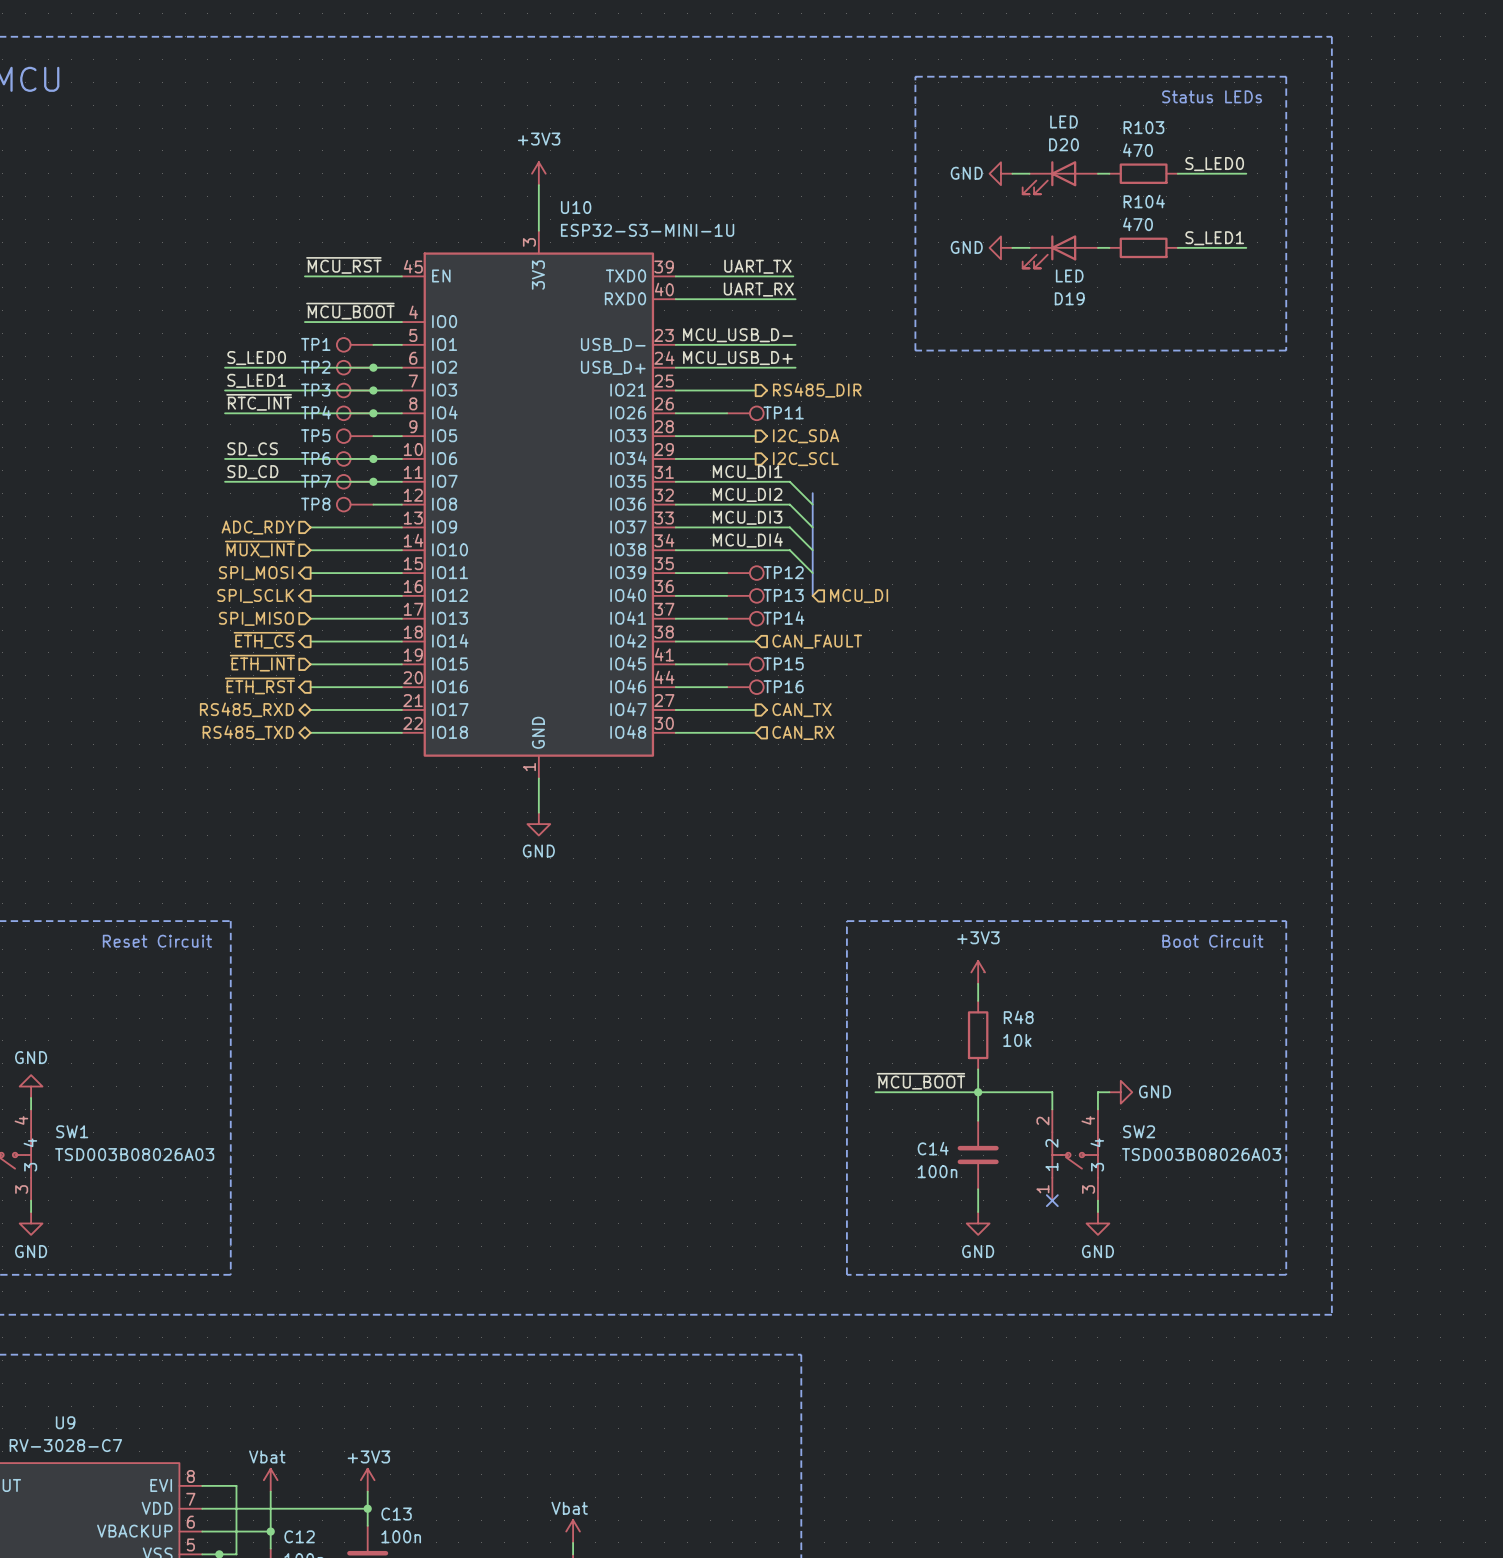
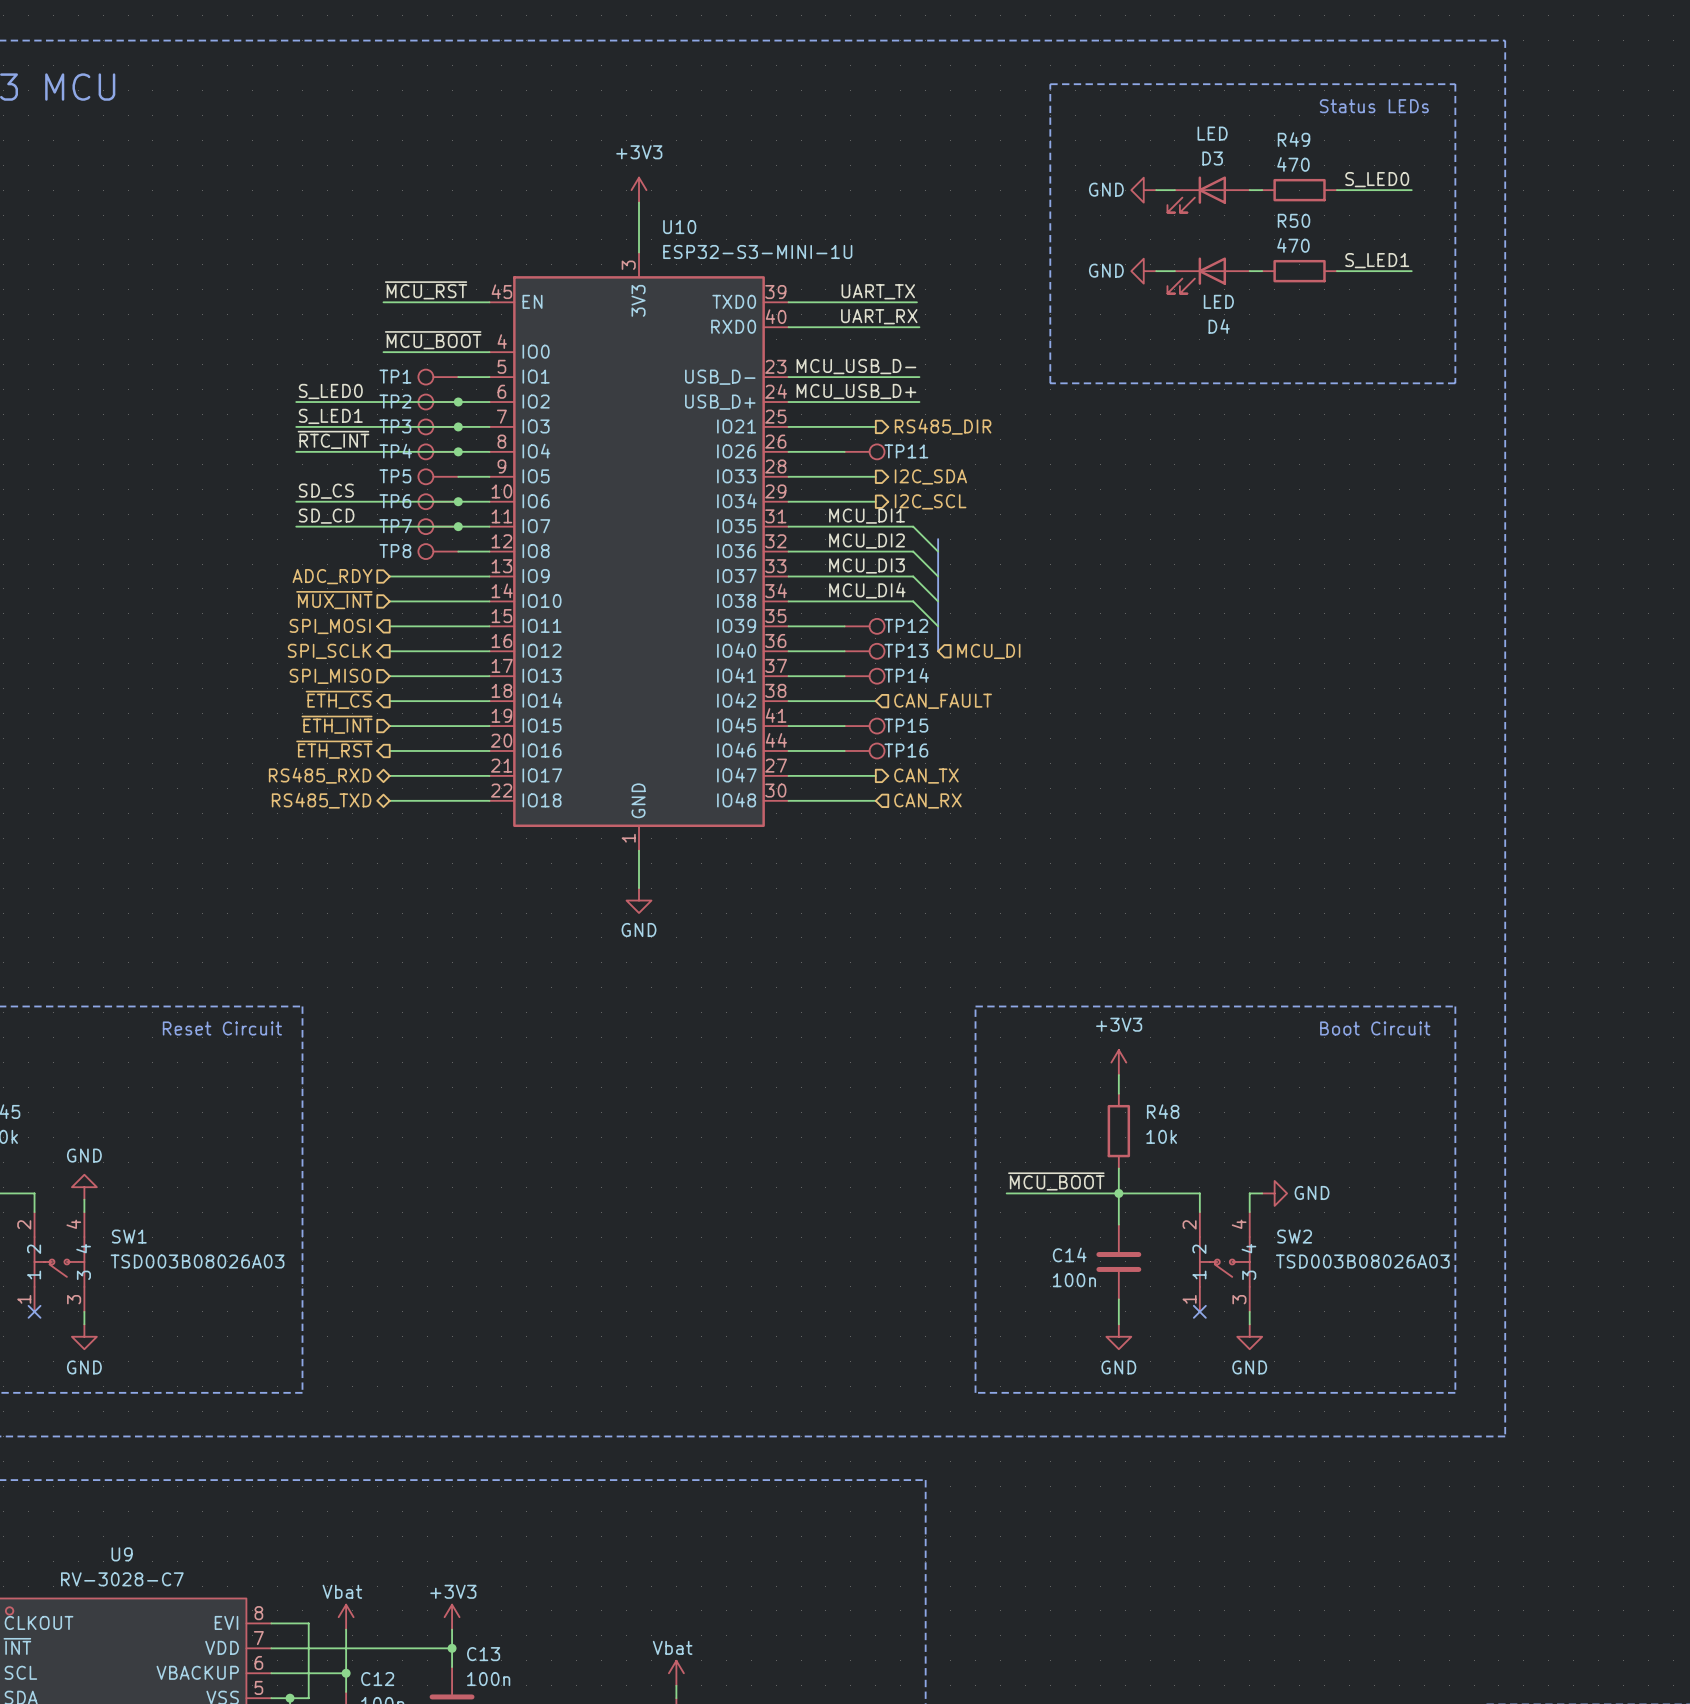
R103 name: R103 (1143, 127) -> R49 (1294, 139)
D20 name: D20 (1064, 144) -> D3 (1212, 158)
R104 name: R104 (1144, 201) -> R50 (1294, 220)
D19 name: D19 (1069, 298) -> D4 (1219, 326)

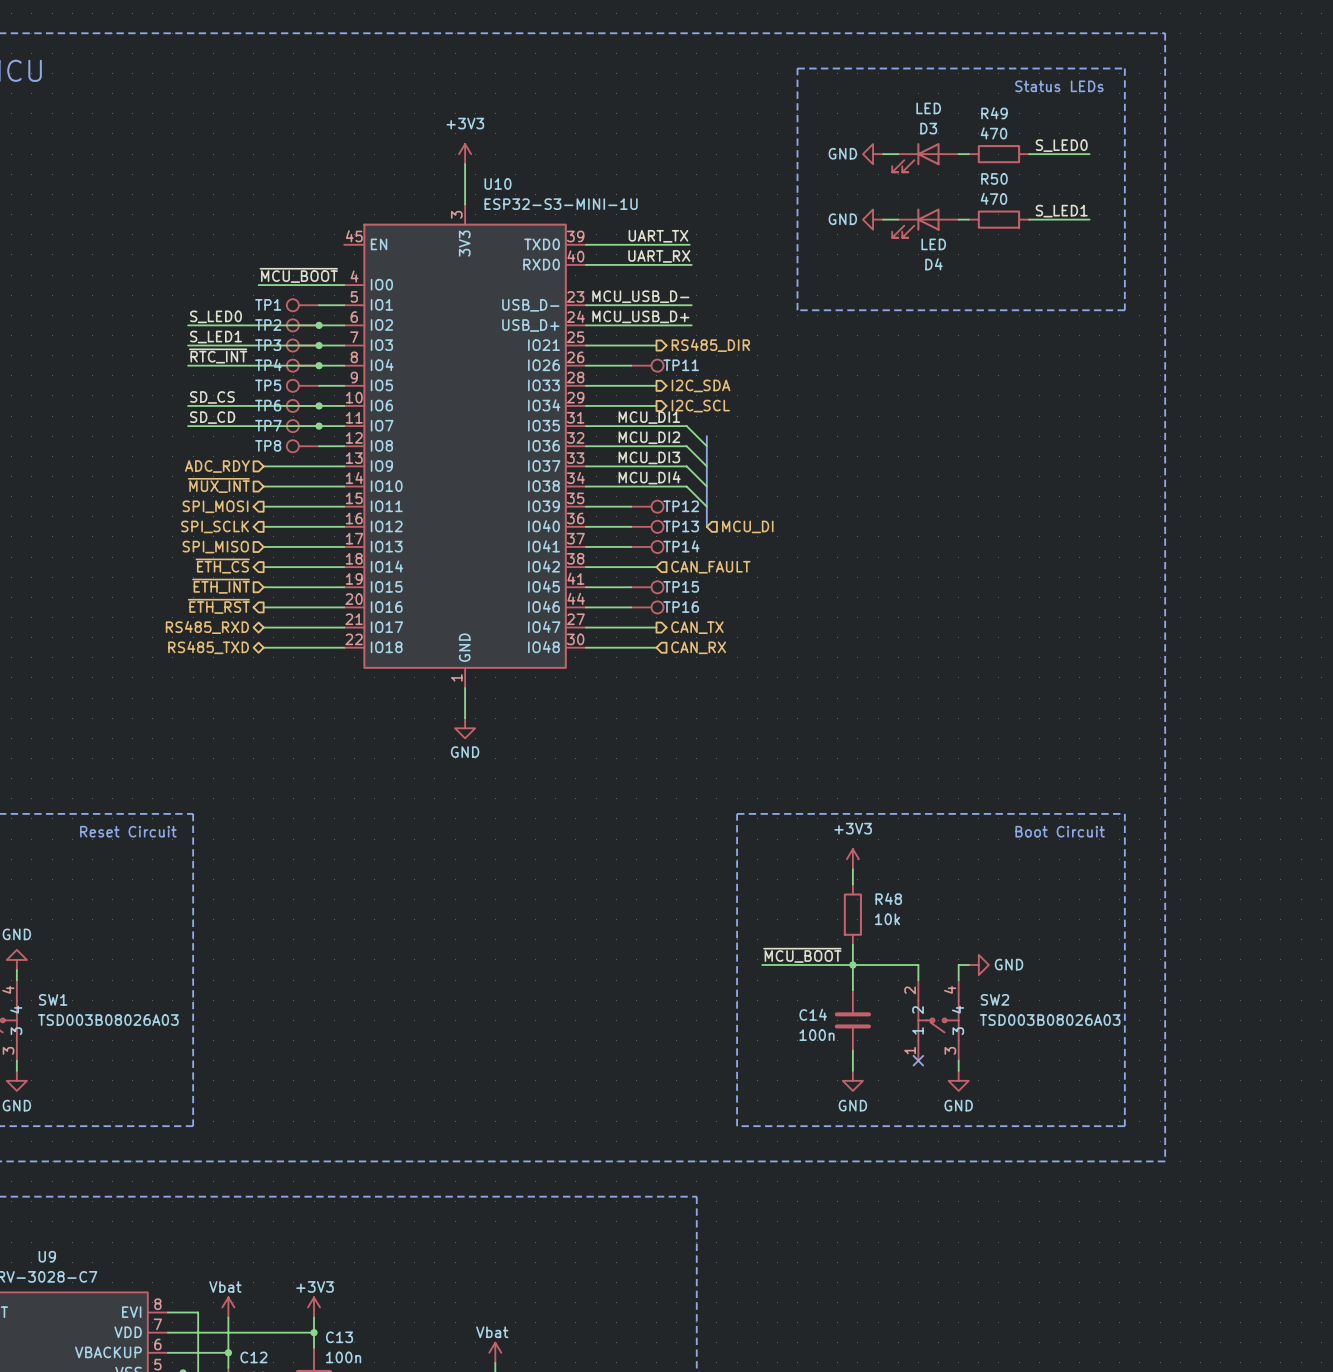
label: ~{MCU_RST} (426, 290) -> none
wire: (383, 302) (489, 302) -> none

